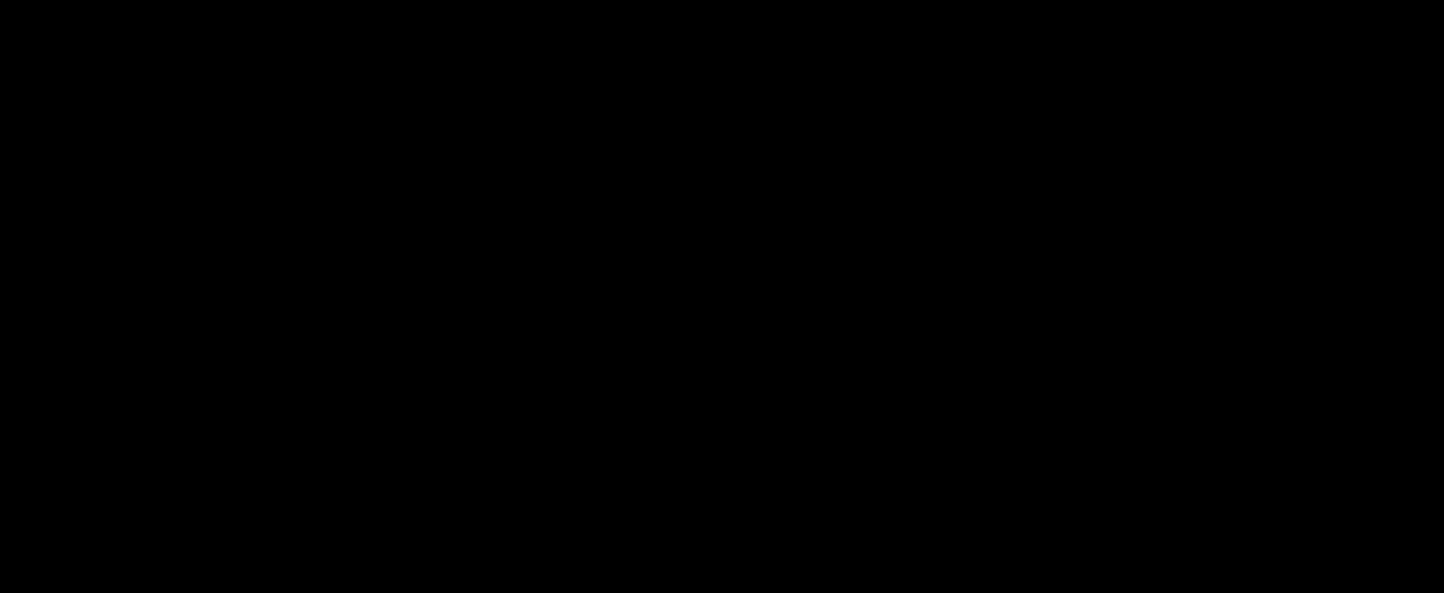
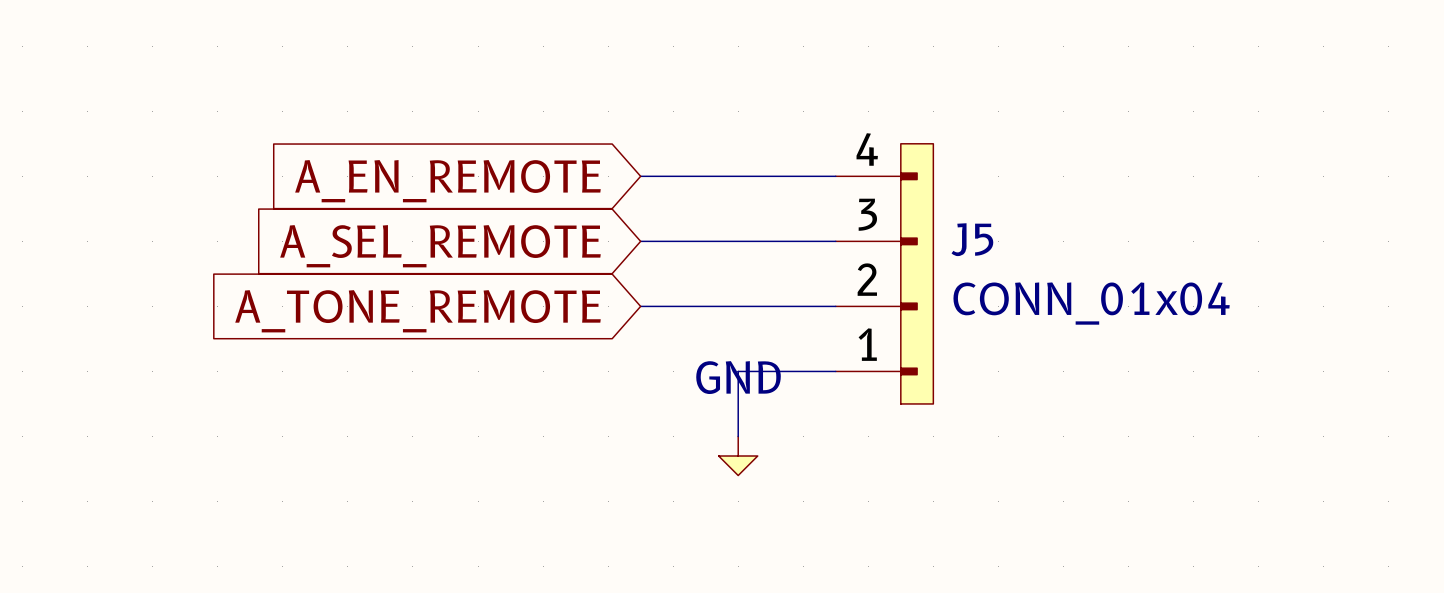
wire: none -> (640, 176) (835, 176)
global label: none -> A_EN_REMOTE (447, 181)
wire: none -> (640, 241) (835, 241)
global label: none -> A_SEL_REMOTE (440, 246)
J5: none -> CONN_01x04 (884, 273)
wire: none -> (640, 306) (835, 306)
global label: none -> A_TONE_REMOTE (417, 311)
wire: none -> (835, 371) (738, 371) (738, 436)
power symbol: none -> GND (738, 456)

